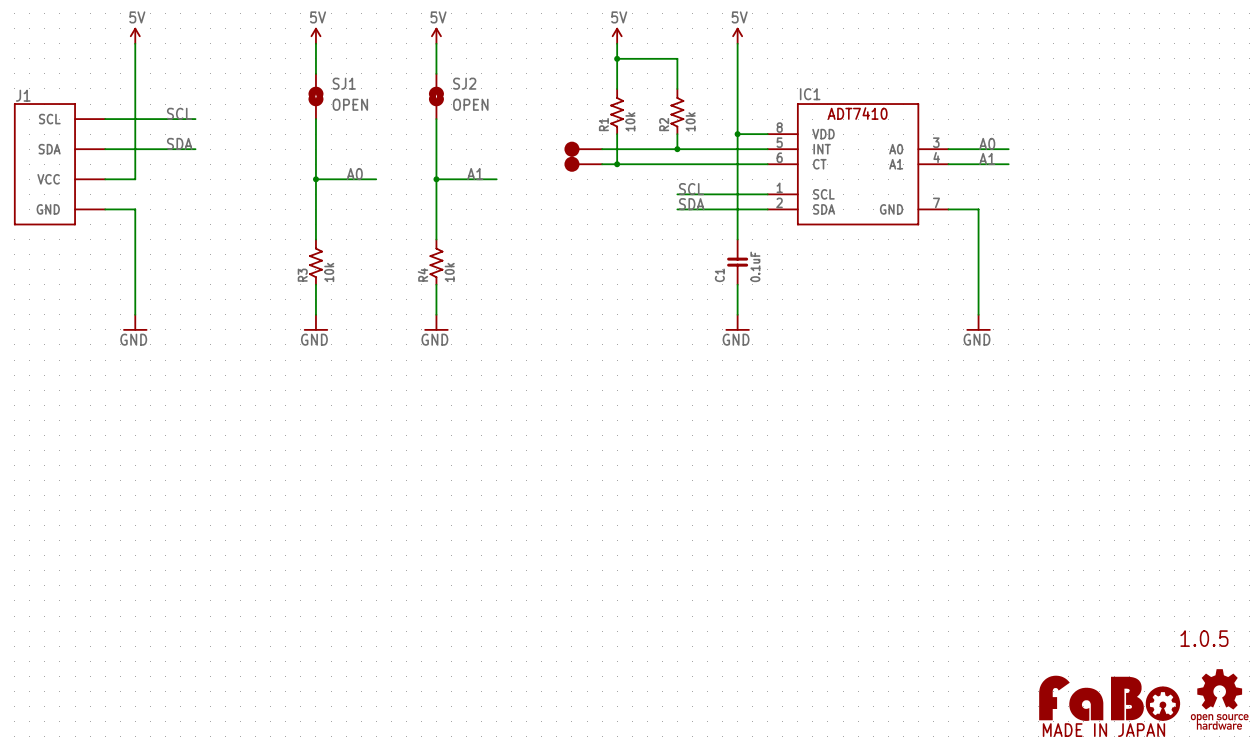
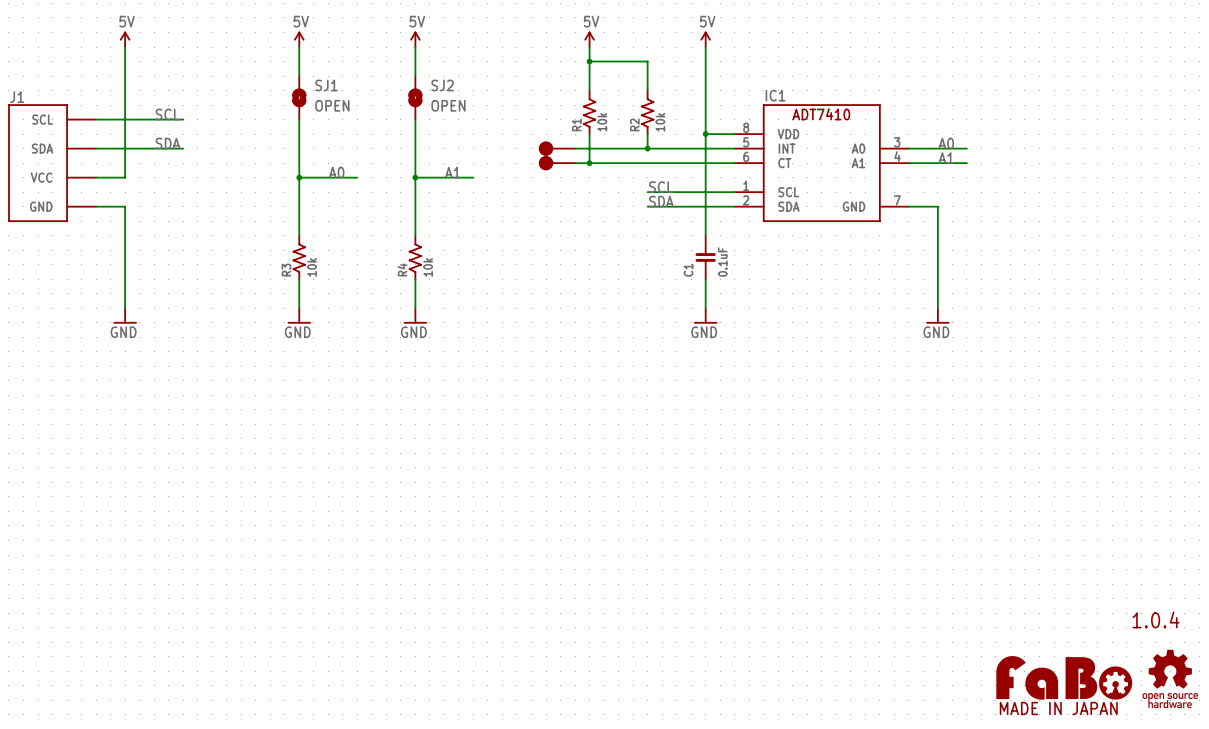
text: 1.0.5 (1204, 638) -> 1.0.4 (1155, 619)

